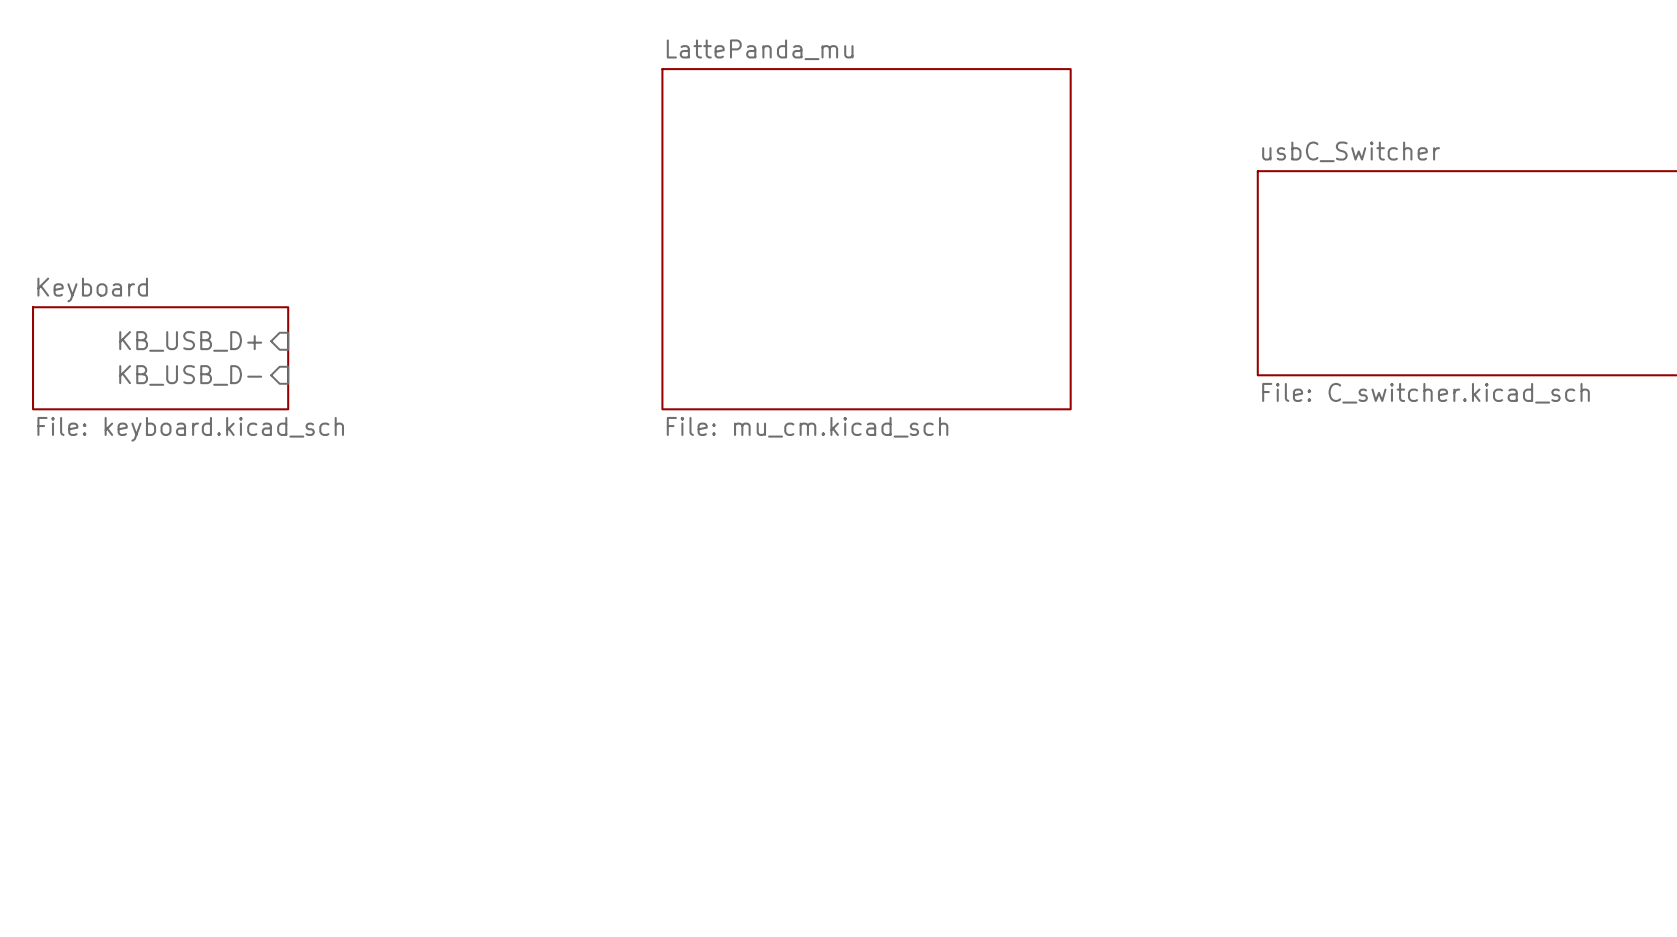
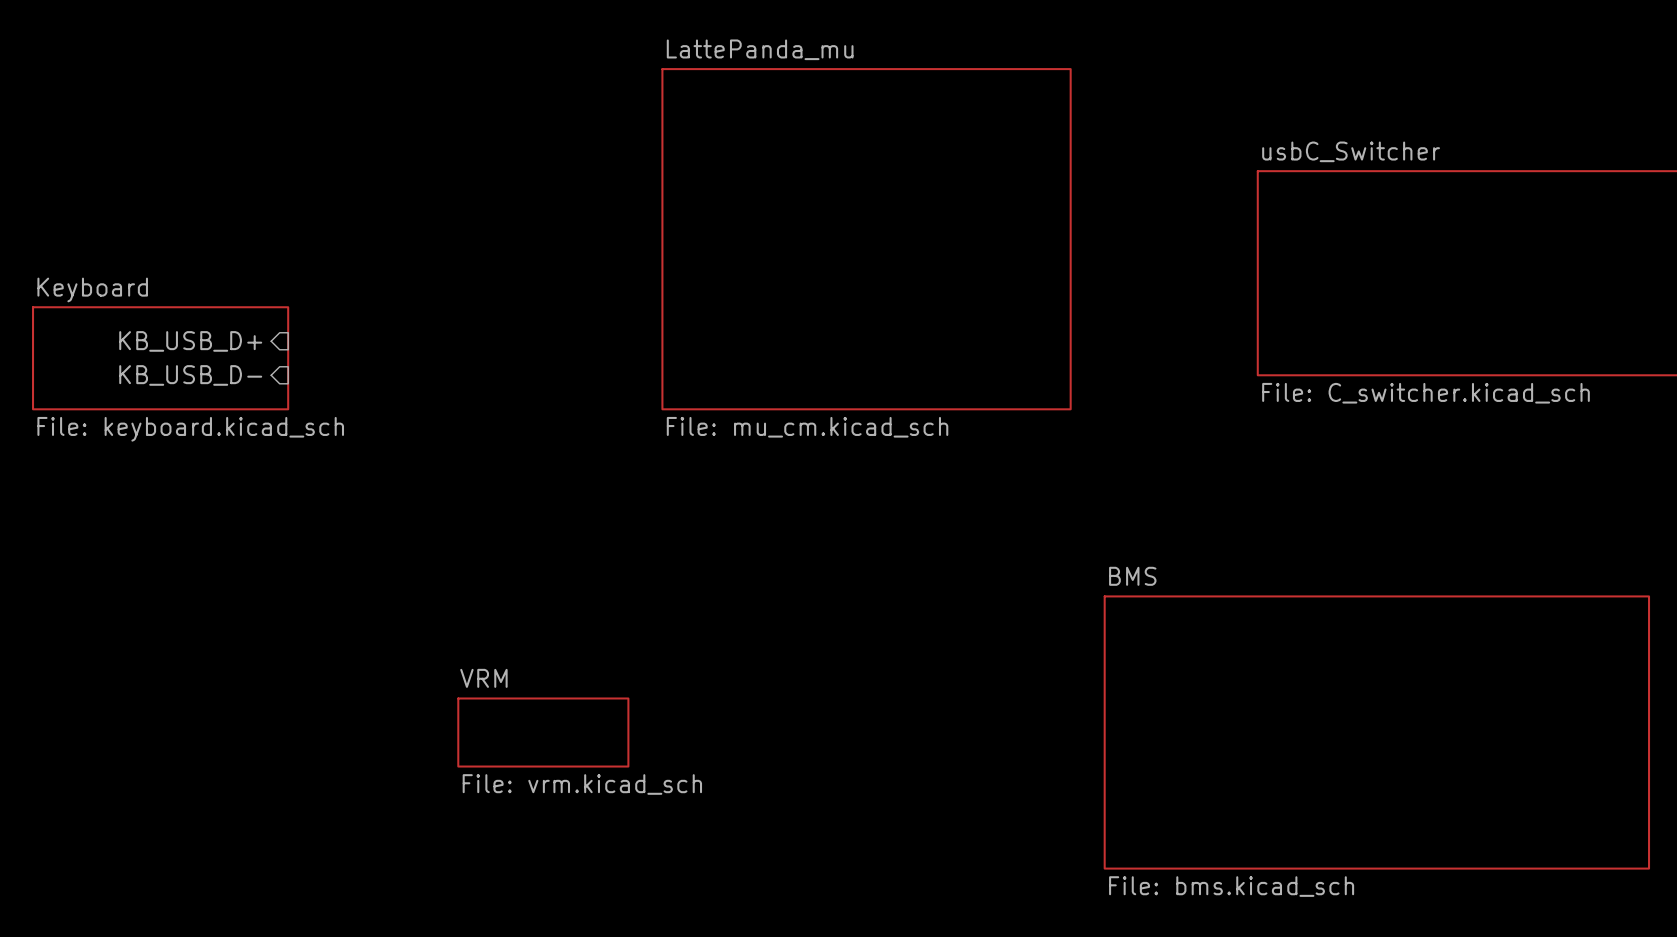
sheet VRM: none -> File: vrm.kicad_sch (543, 732)
sheet BMS: none -> File: bms.kicad_sch (1376, 732)

